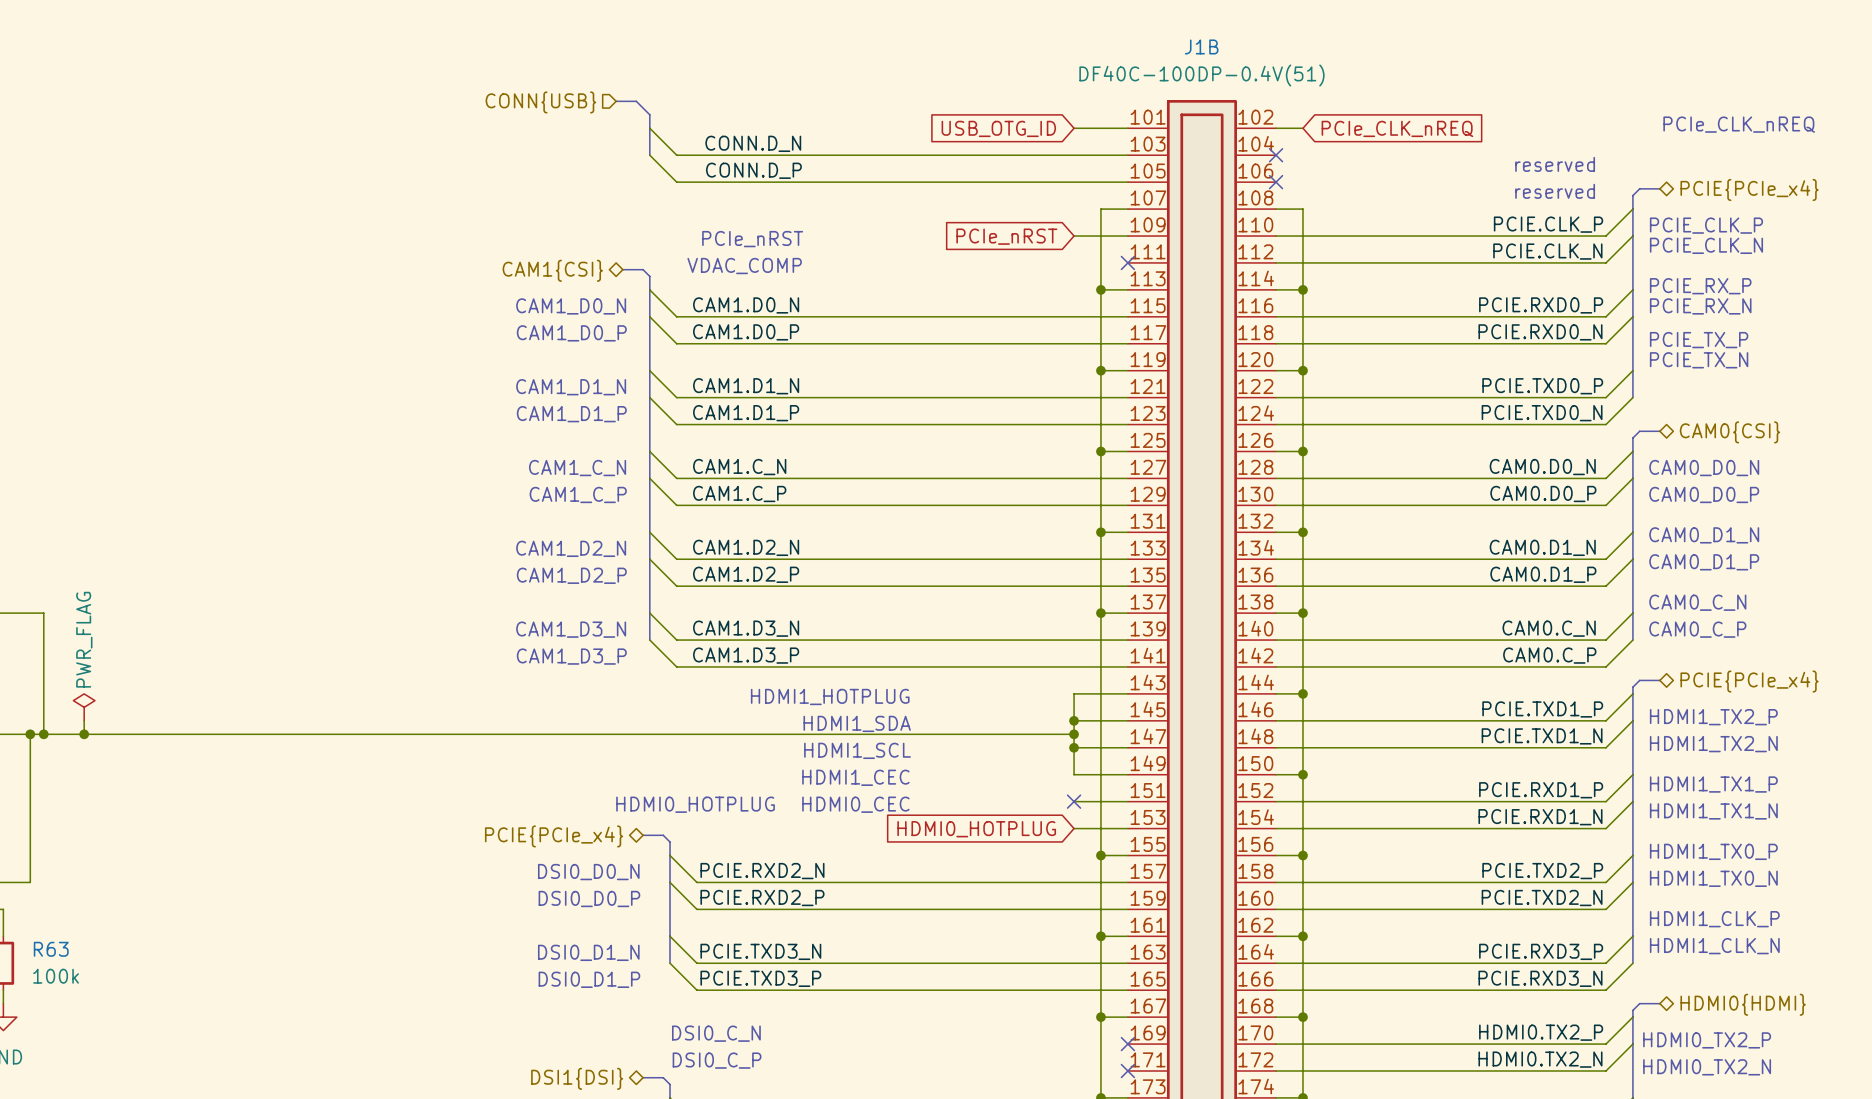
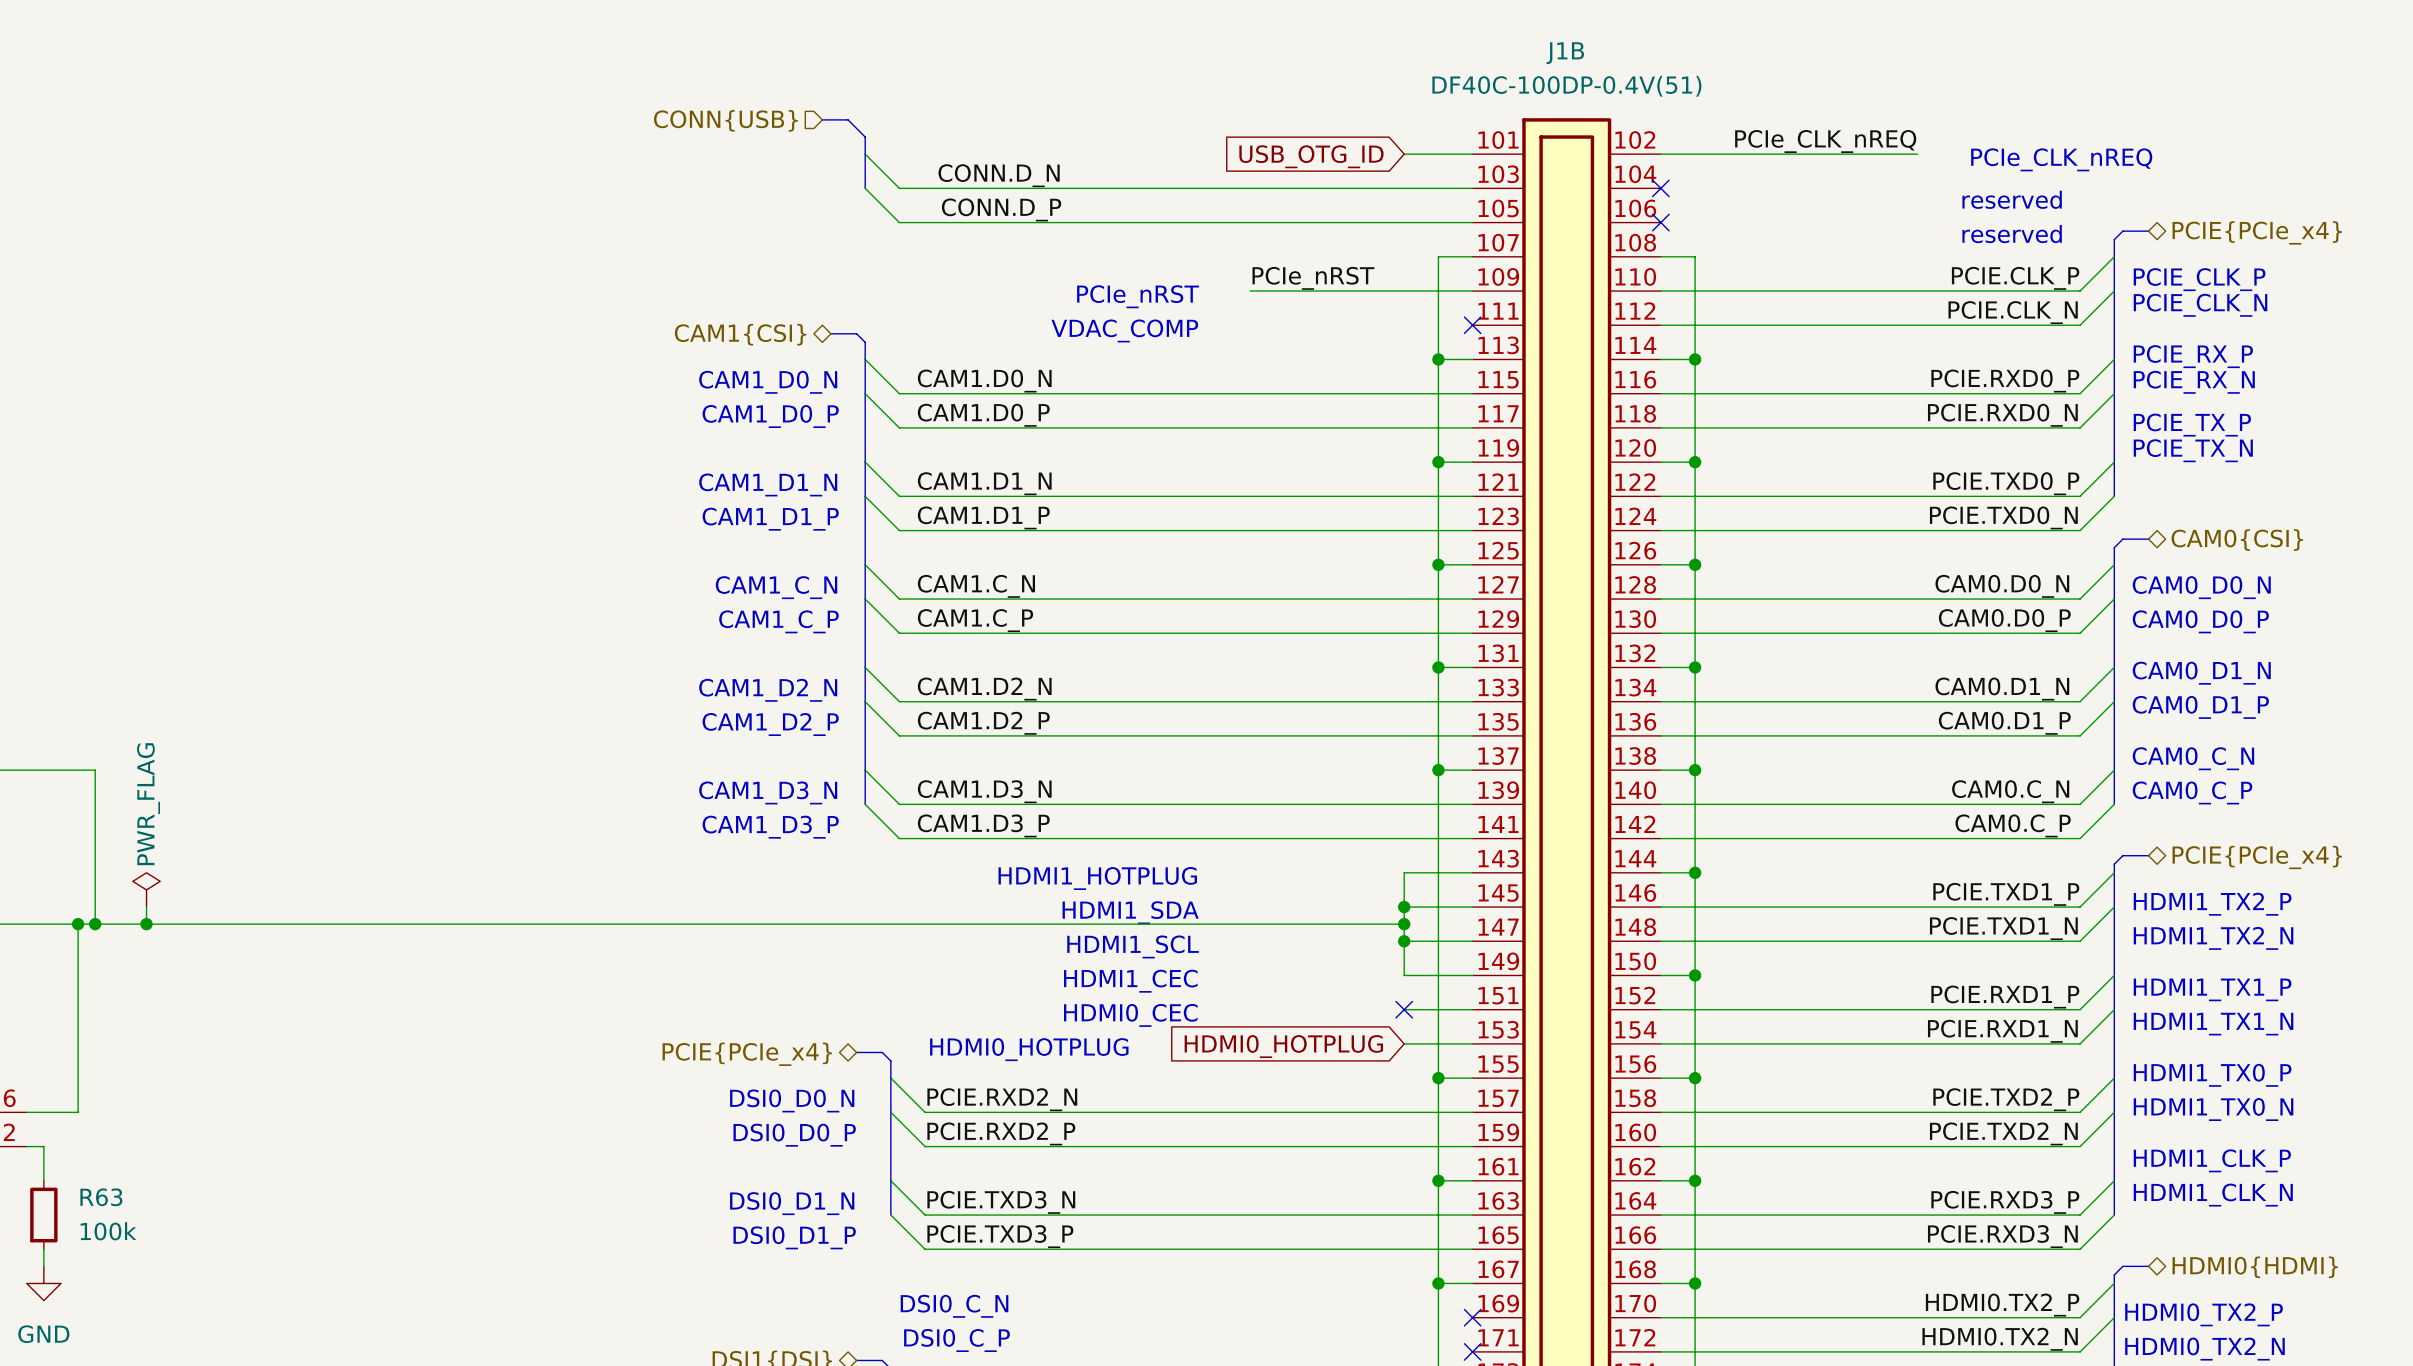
label: none -> PCIe_CLK_nREQ (1825, 141)
text position: PCIe_CLK_nREQ (1739, 124) -> PCIe_CLK_nREQ (2061, 159)
wire: none -> (1695, 154) (1917, 154)
global label: PCIe_CLK_nREQ (1397, 128) -> none
label: none -> PCIe_nRST (1313, 278)
wire: none -> (1250, 291) (1404, 291)
global label: PCIe_nRST (1006, 236) -> none
text position: PCIe_nRST (752, 239) -> PCIe_nRST (1138, 296)
text position: VDAC_COMP (744, 266) -> VDAC_COMP (1124, 330)
text position: HDMI0_HOTPLUG (695, 804) -> HDMI0_HOTPLUG (1029, 1049)

